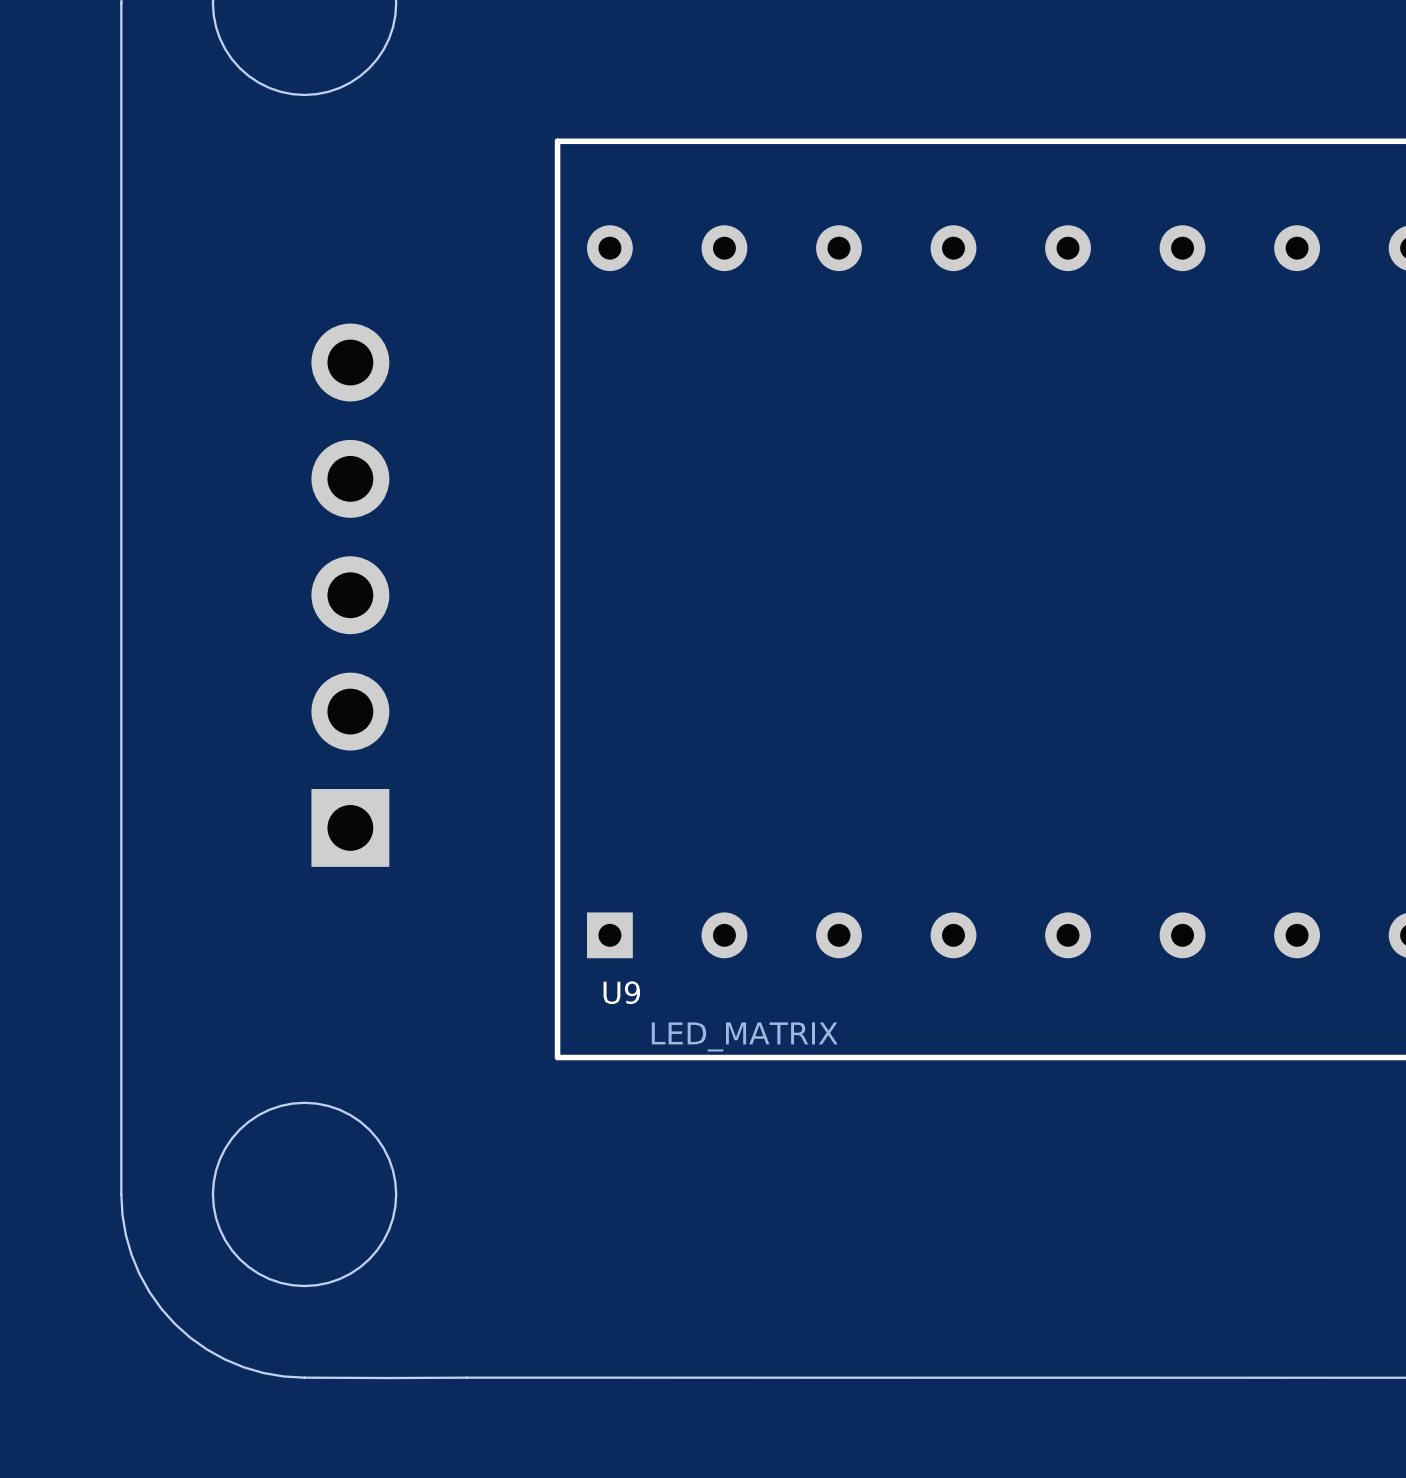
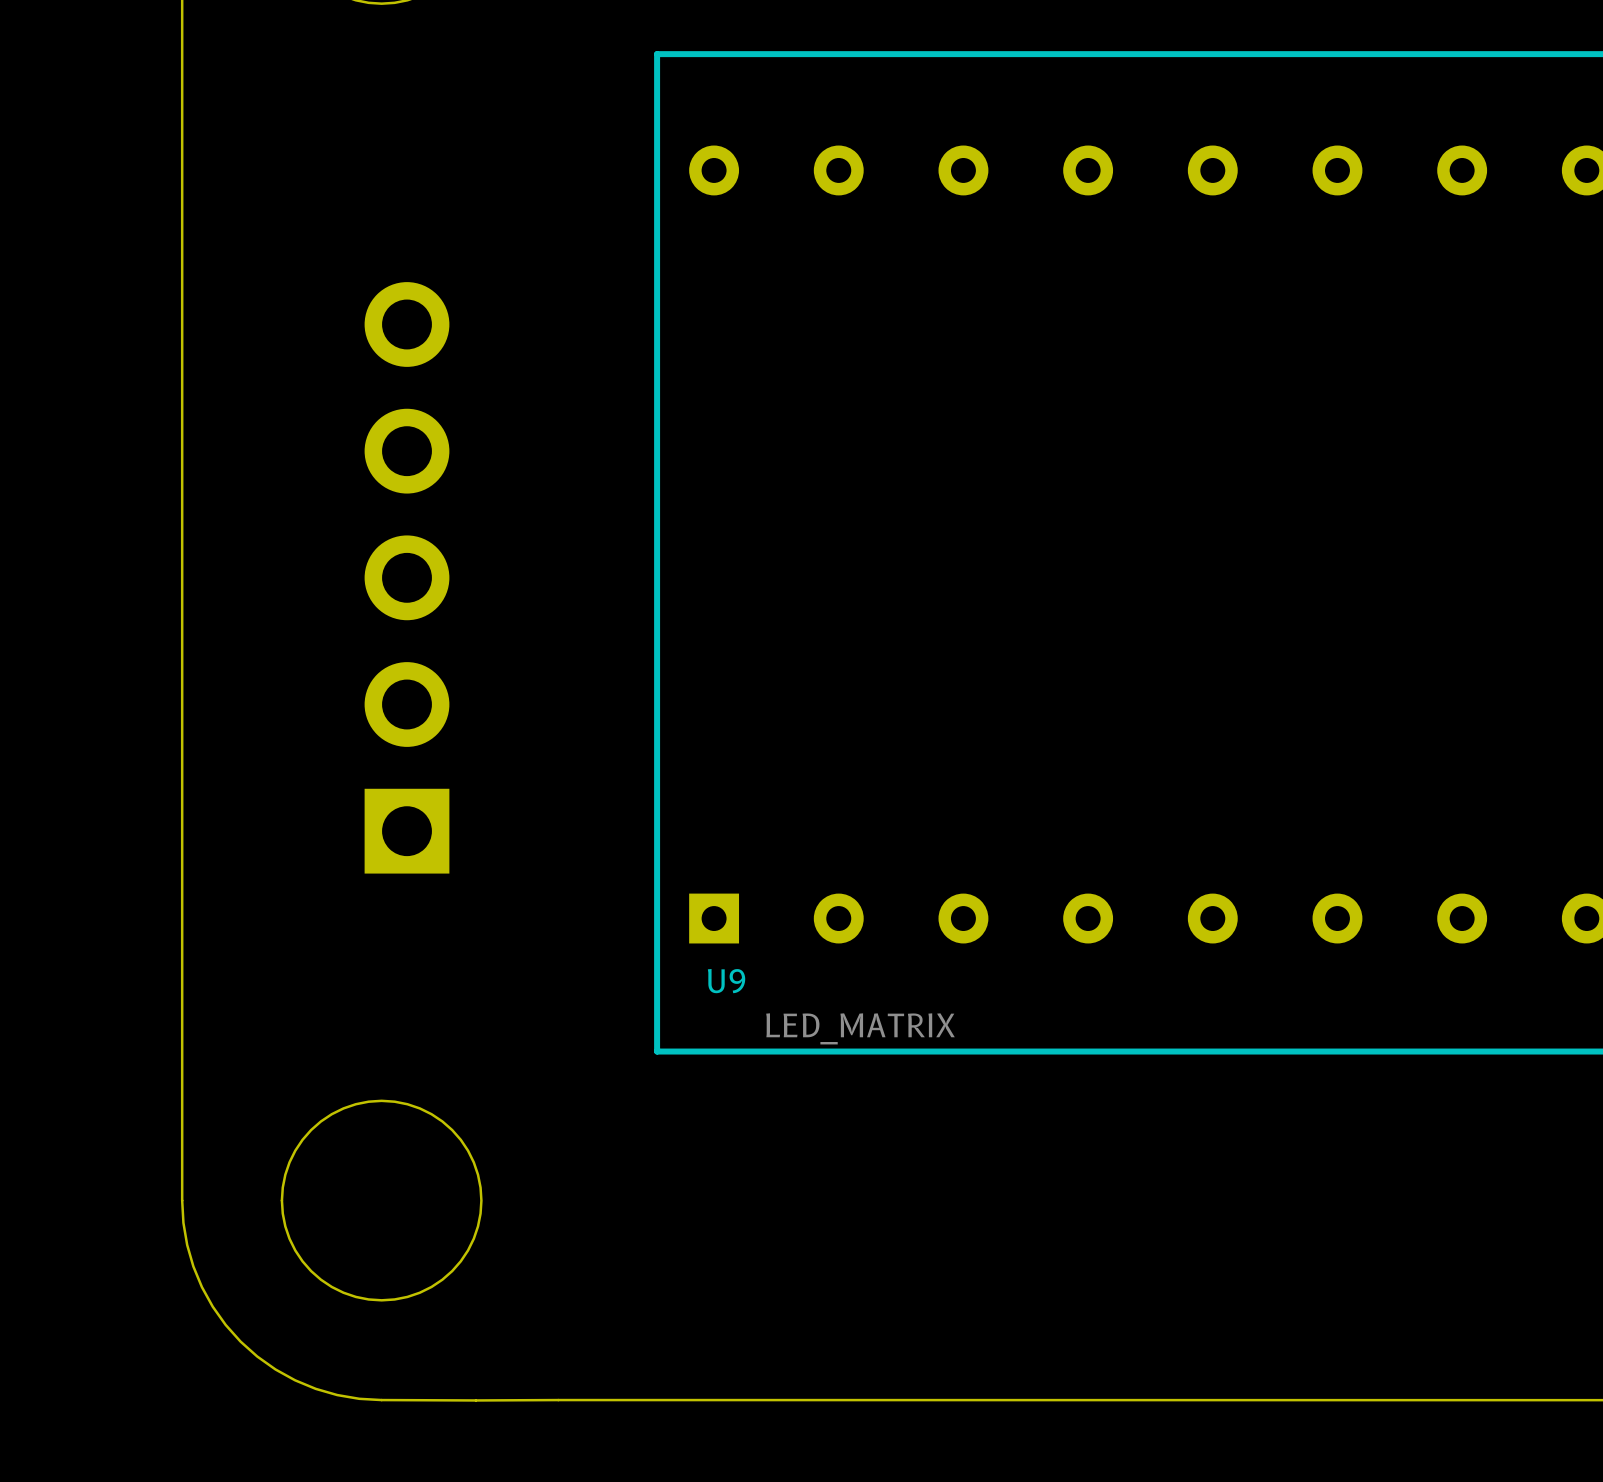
part position: (350, 595) -> (407, 577)

